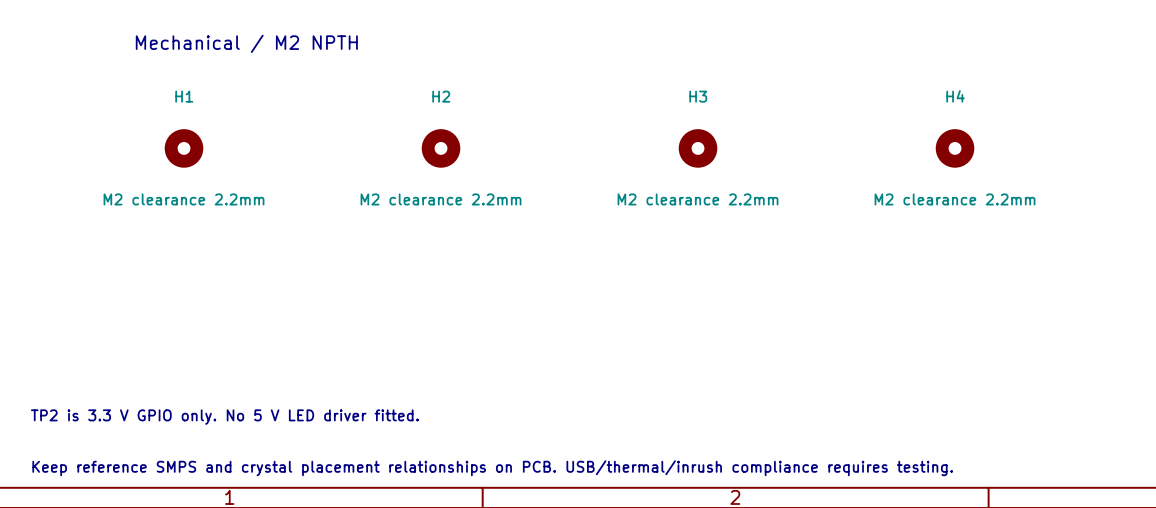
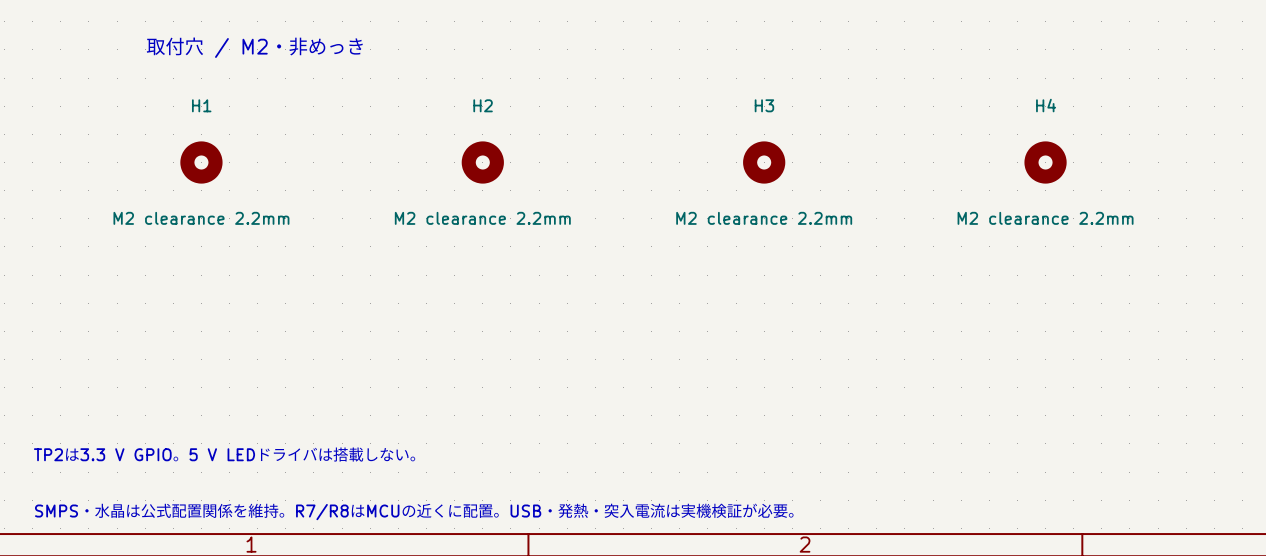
text: Mechanical / M2 NPTH (246, 43) -> 取付穴 / M2・非めっき (254, 47)
text: TP2 is 3.3 V GPIO only. No 5 V LED driver fitted. (224, 417) -> TP2は3.3 V GPIO。5 V LEDドライバは搭載しない。 (224, 454)
text: Keep reference SMPS and crystal placement relationships on PCB. USB/thermal/inrush compliance requires testing. (492, 468) -> SMPS・水晶は公式配置関係を維持。R7/R8はMCUの近くに配置。USB・発熱・突入電流は実機検証が必要。 (414, 511)

